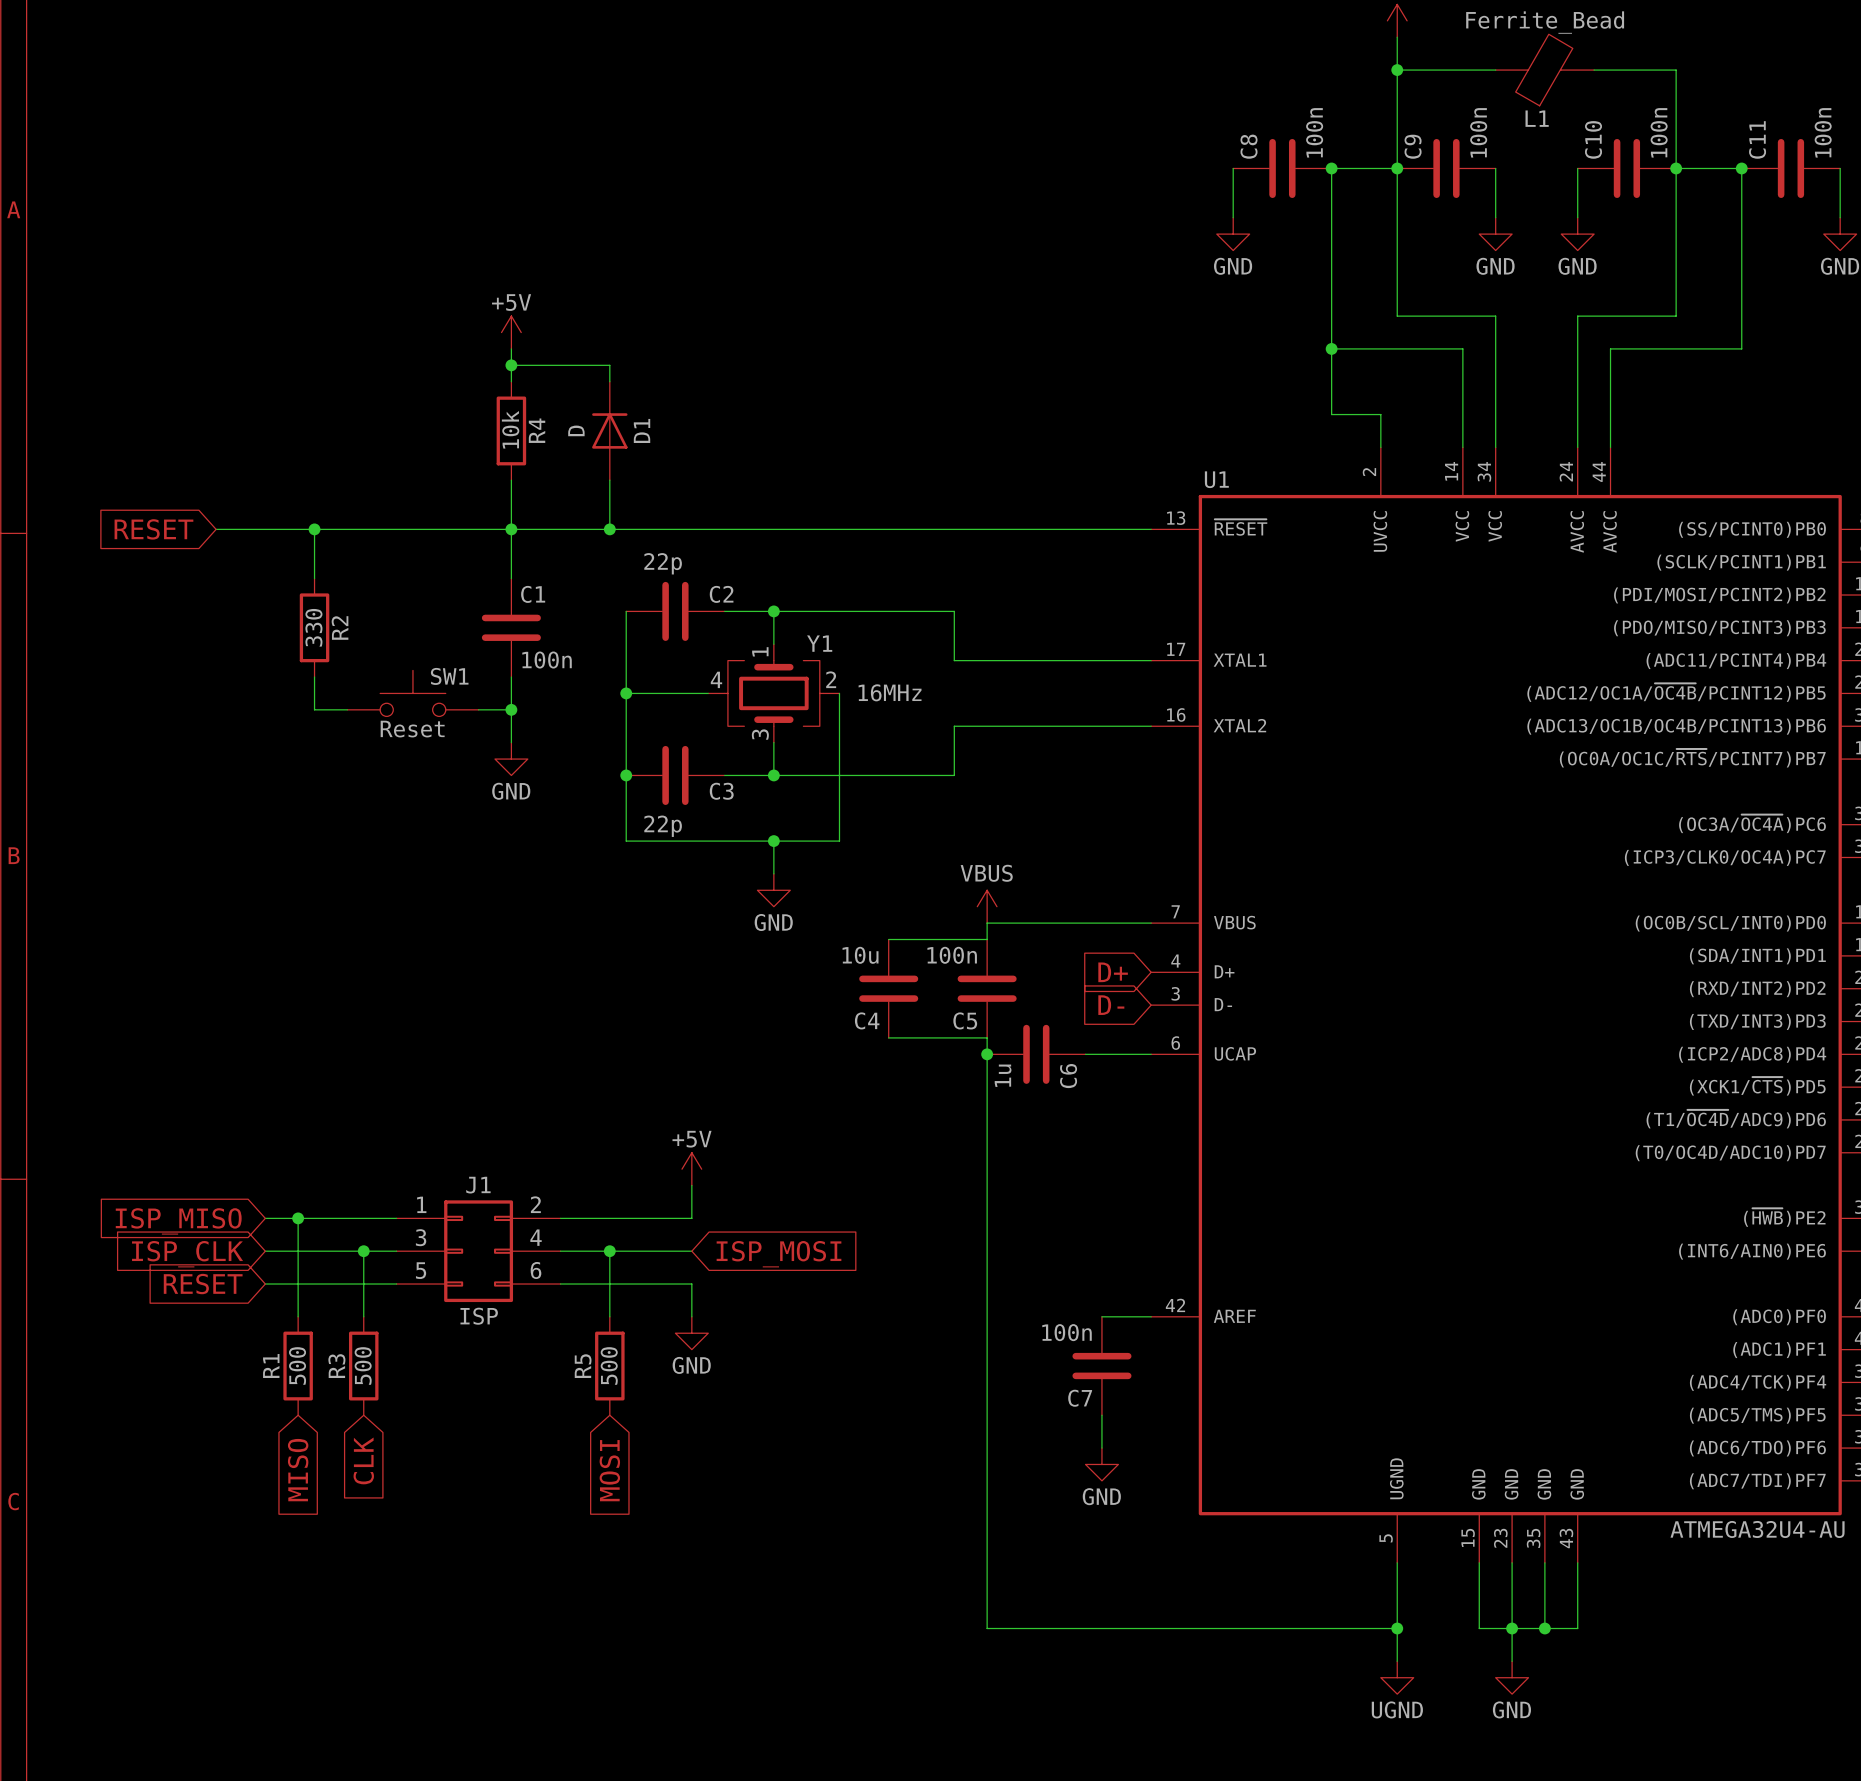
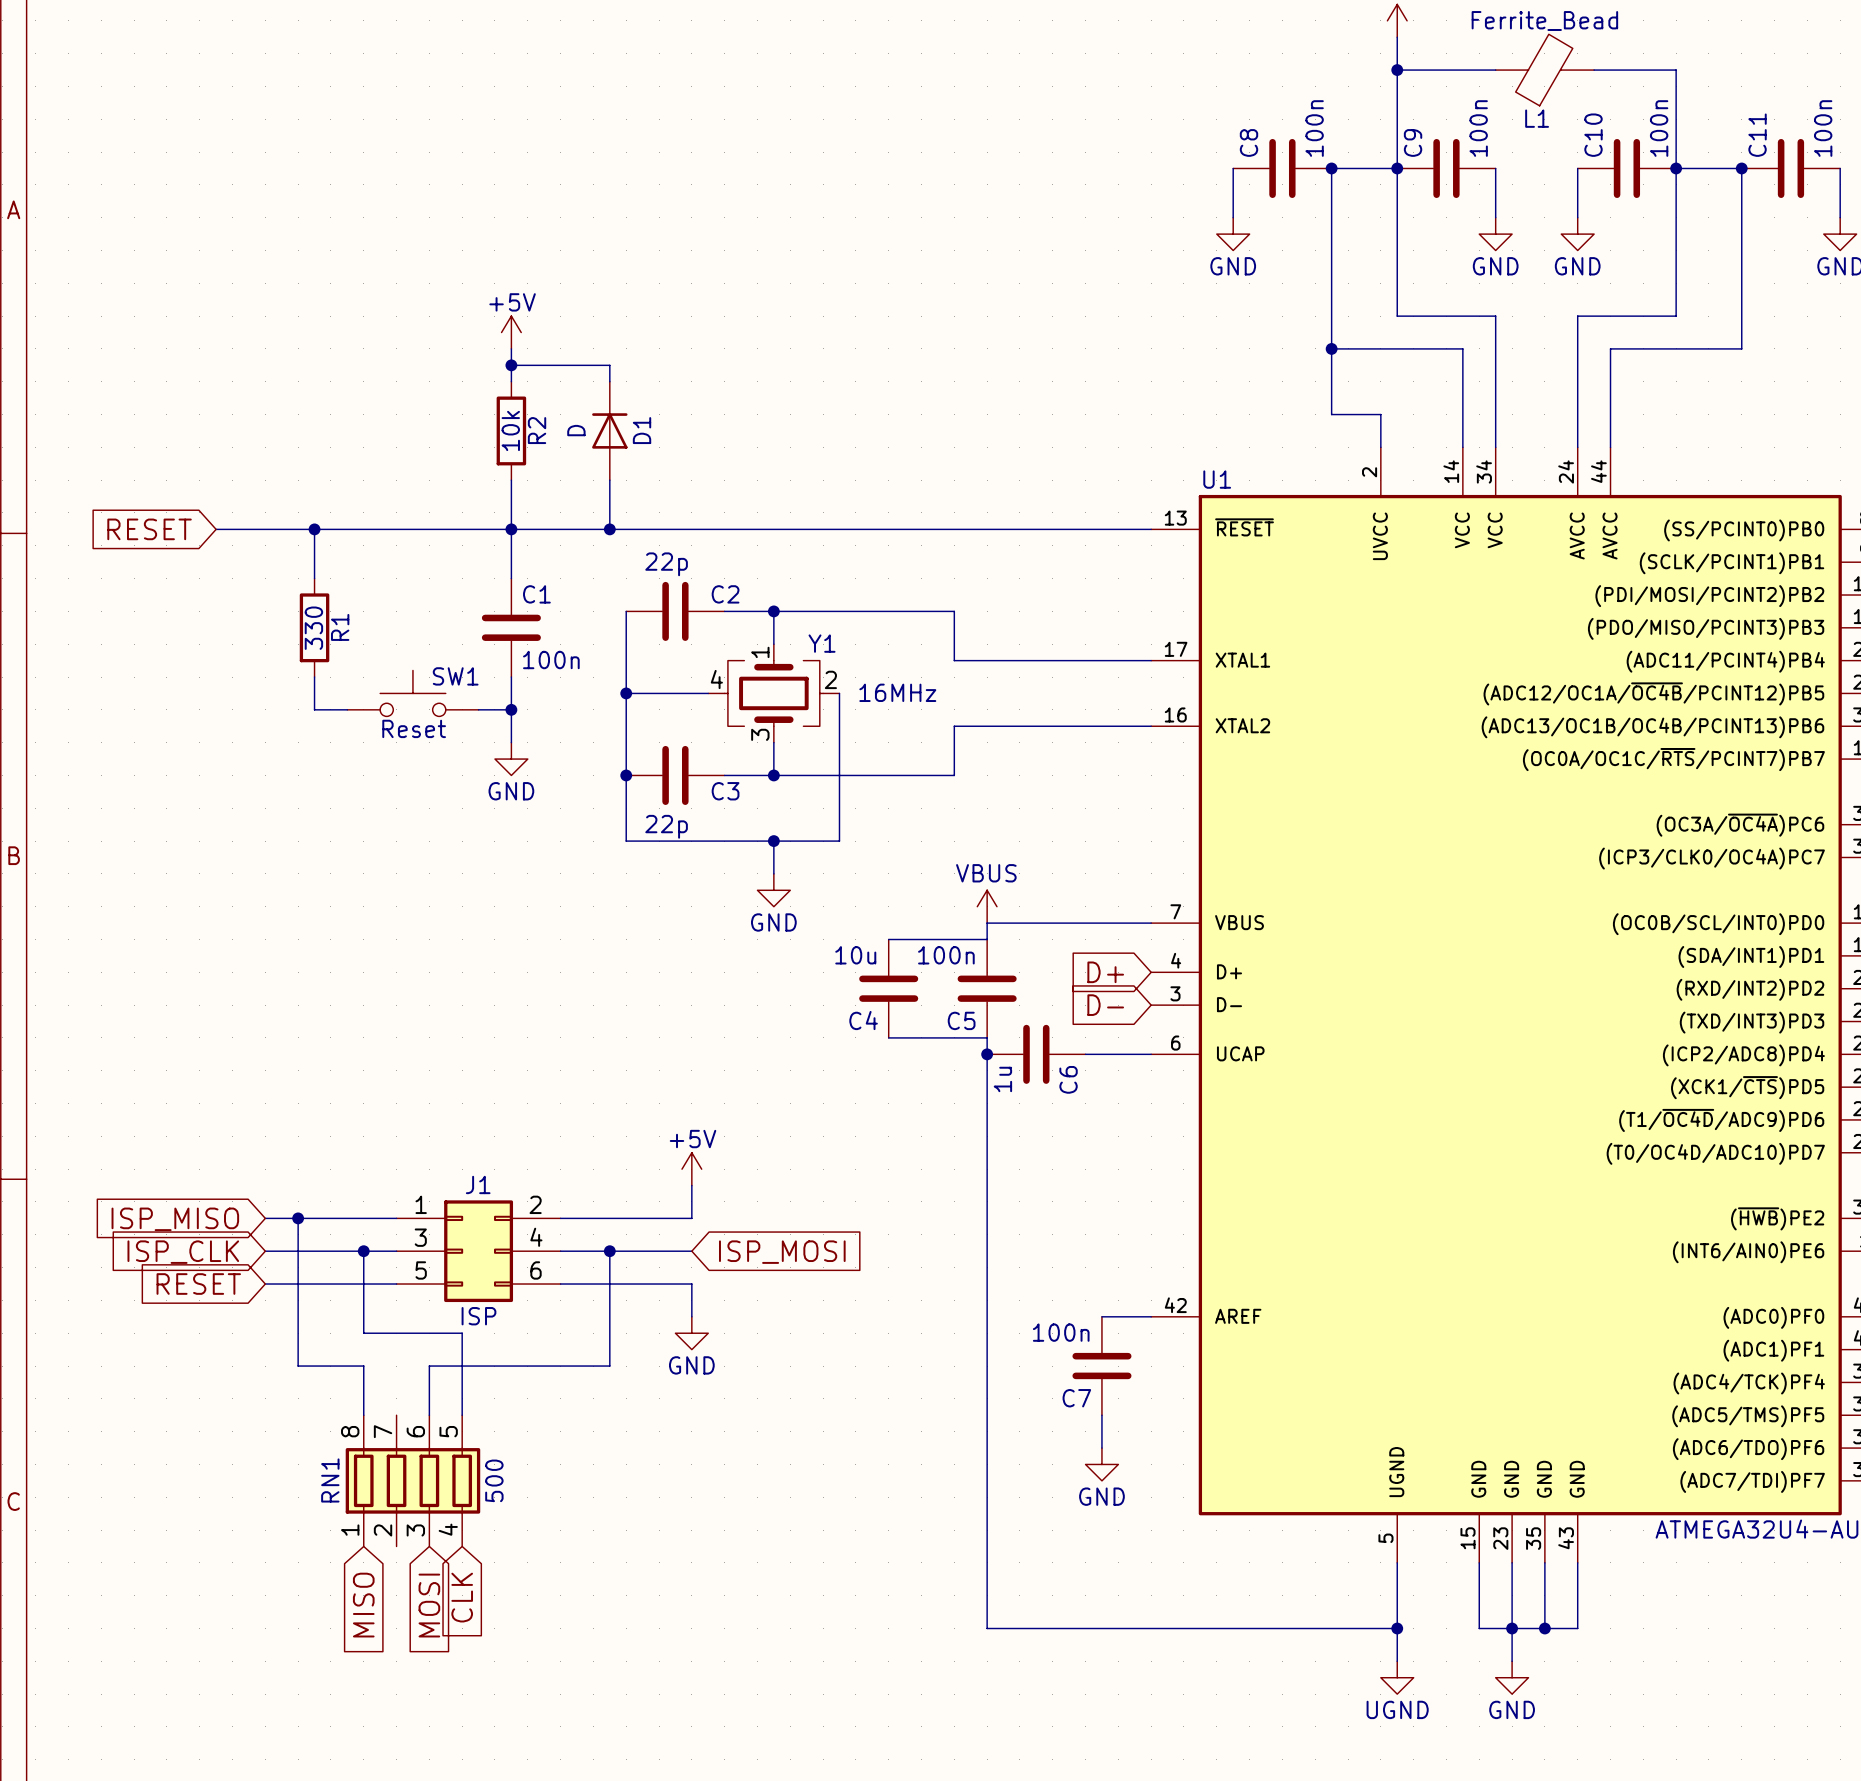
R4 name: R4 (537, 430) -> R2 (537, 430)
R2 name: R2 (340, 627) -> R1 (340, 627)
wire: none -> (298, 1316) (298, 1366) (363, 1366) (363, 1415)
wire: none -> (363, 1316) (363, 1333) (462, 1333) (462, 1415)
wire: none -> (609, 1316) (609, 1366) (429, 1366) (429, 1415)
R1: 500 (298, 1366) -> none
R3: 500 (363, 1366) -> none
R5: 500 (609, 1366) -> none
global label position: CLK (363, 1460) -> CLK (462, 1597)
global label position: MISO (298, 1470) -> MISO (363, 1605)
global label position: MOSI (609, 1470) -> MOSI (429, 1605)
RN1: none -> 500 (412, 1480)

